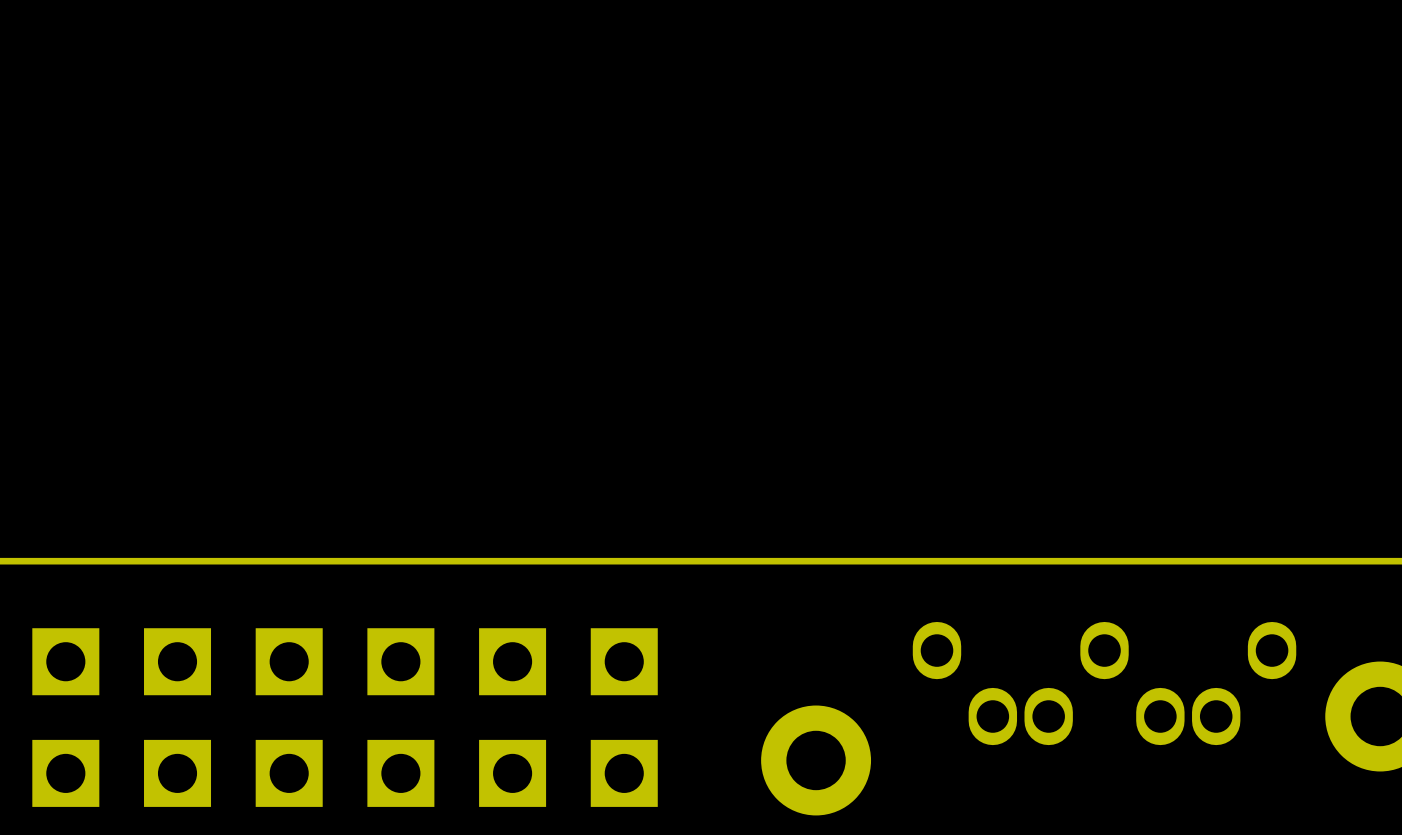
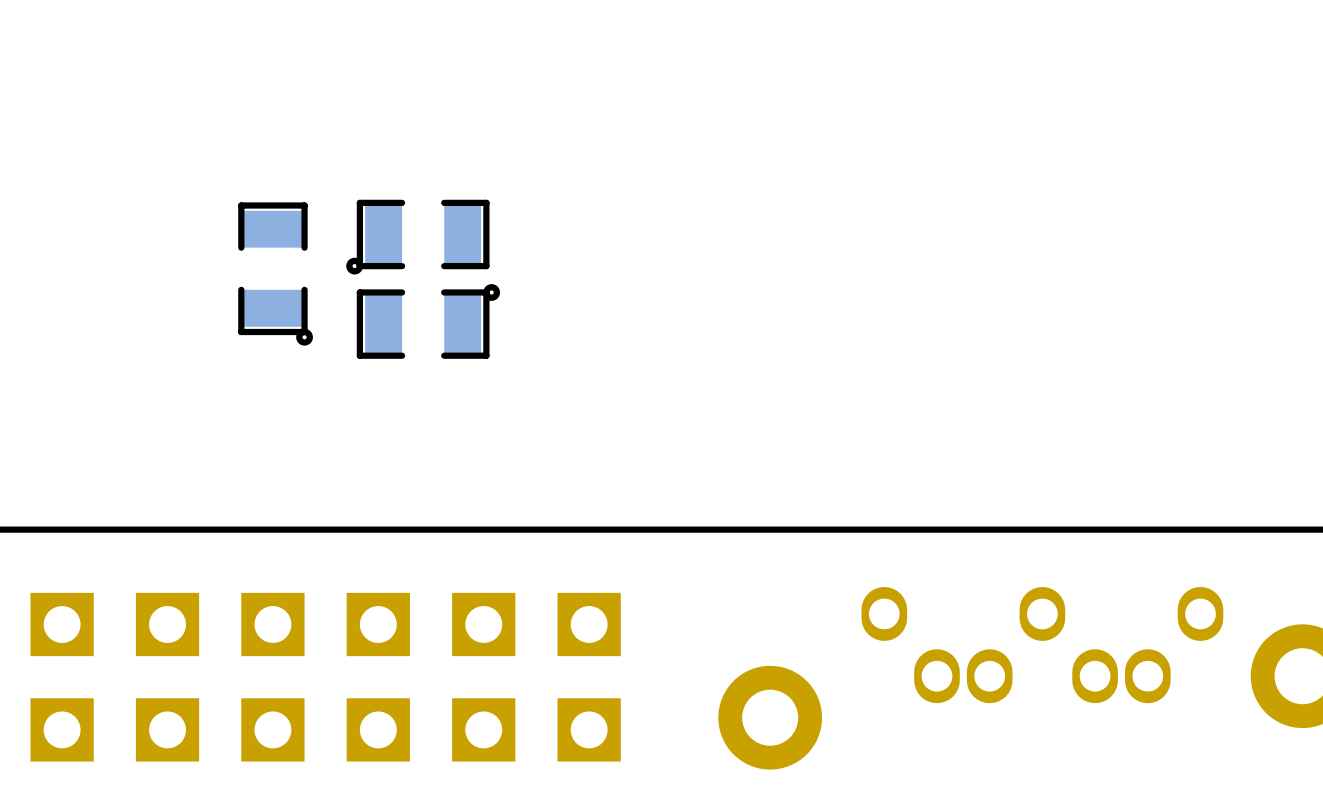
part: none -> (417, 237)
part: none -> (275, 274)
part: none -> (428, 321)

